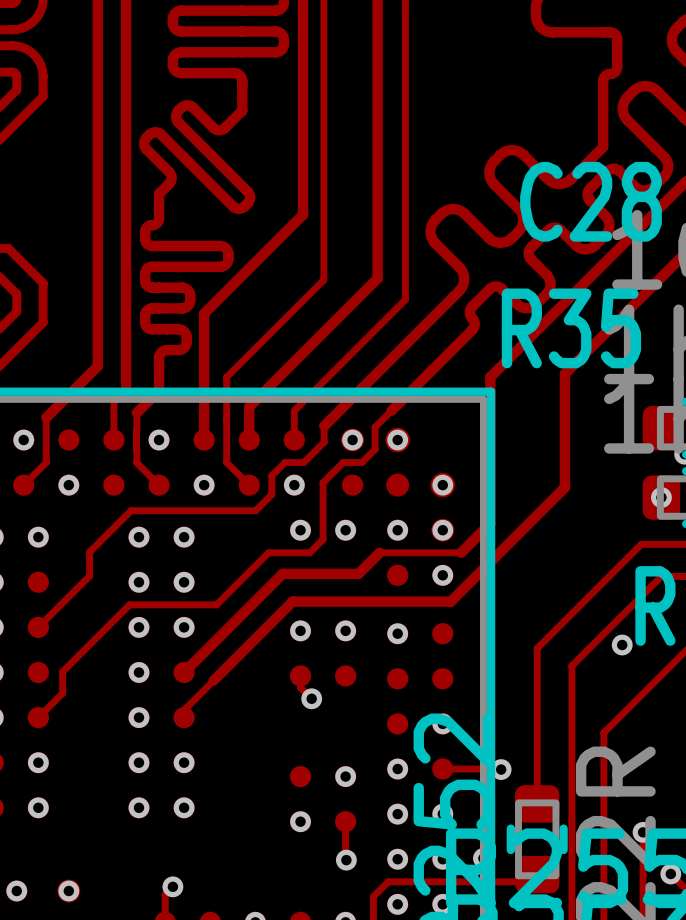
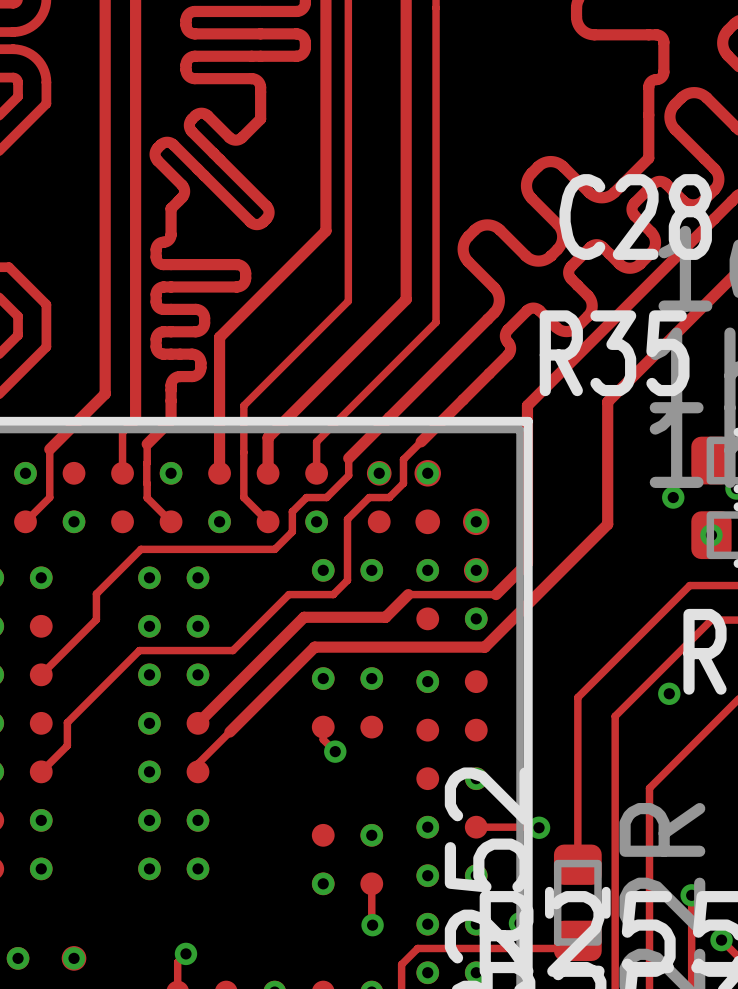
via: none -> (673, 497)

